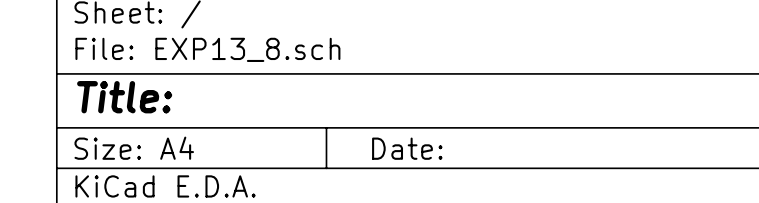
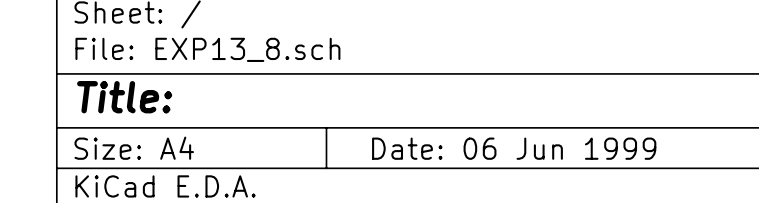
title block: Date: (407, 148) -> Date: 06 Jun 1999 (514, 148)

